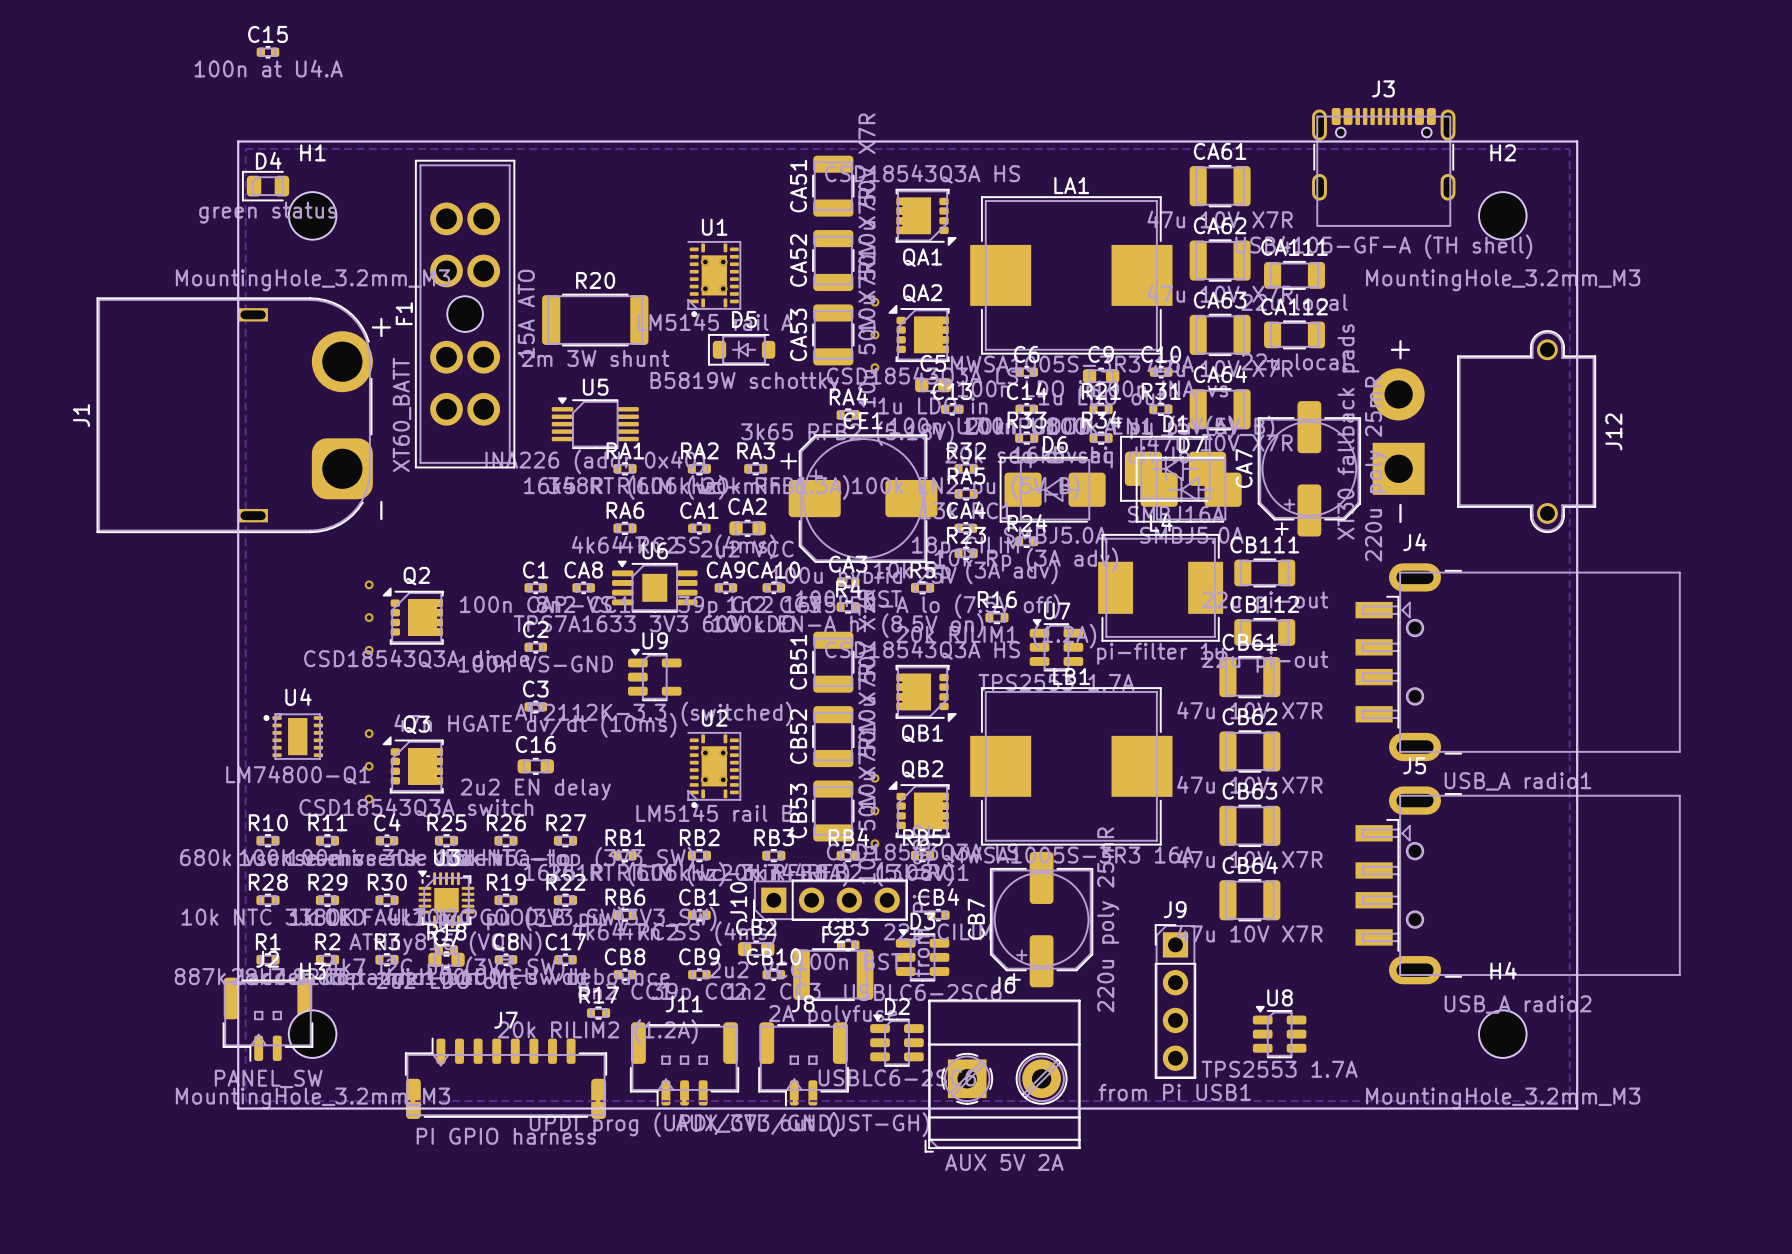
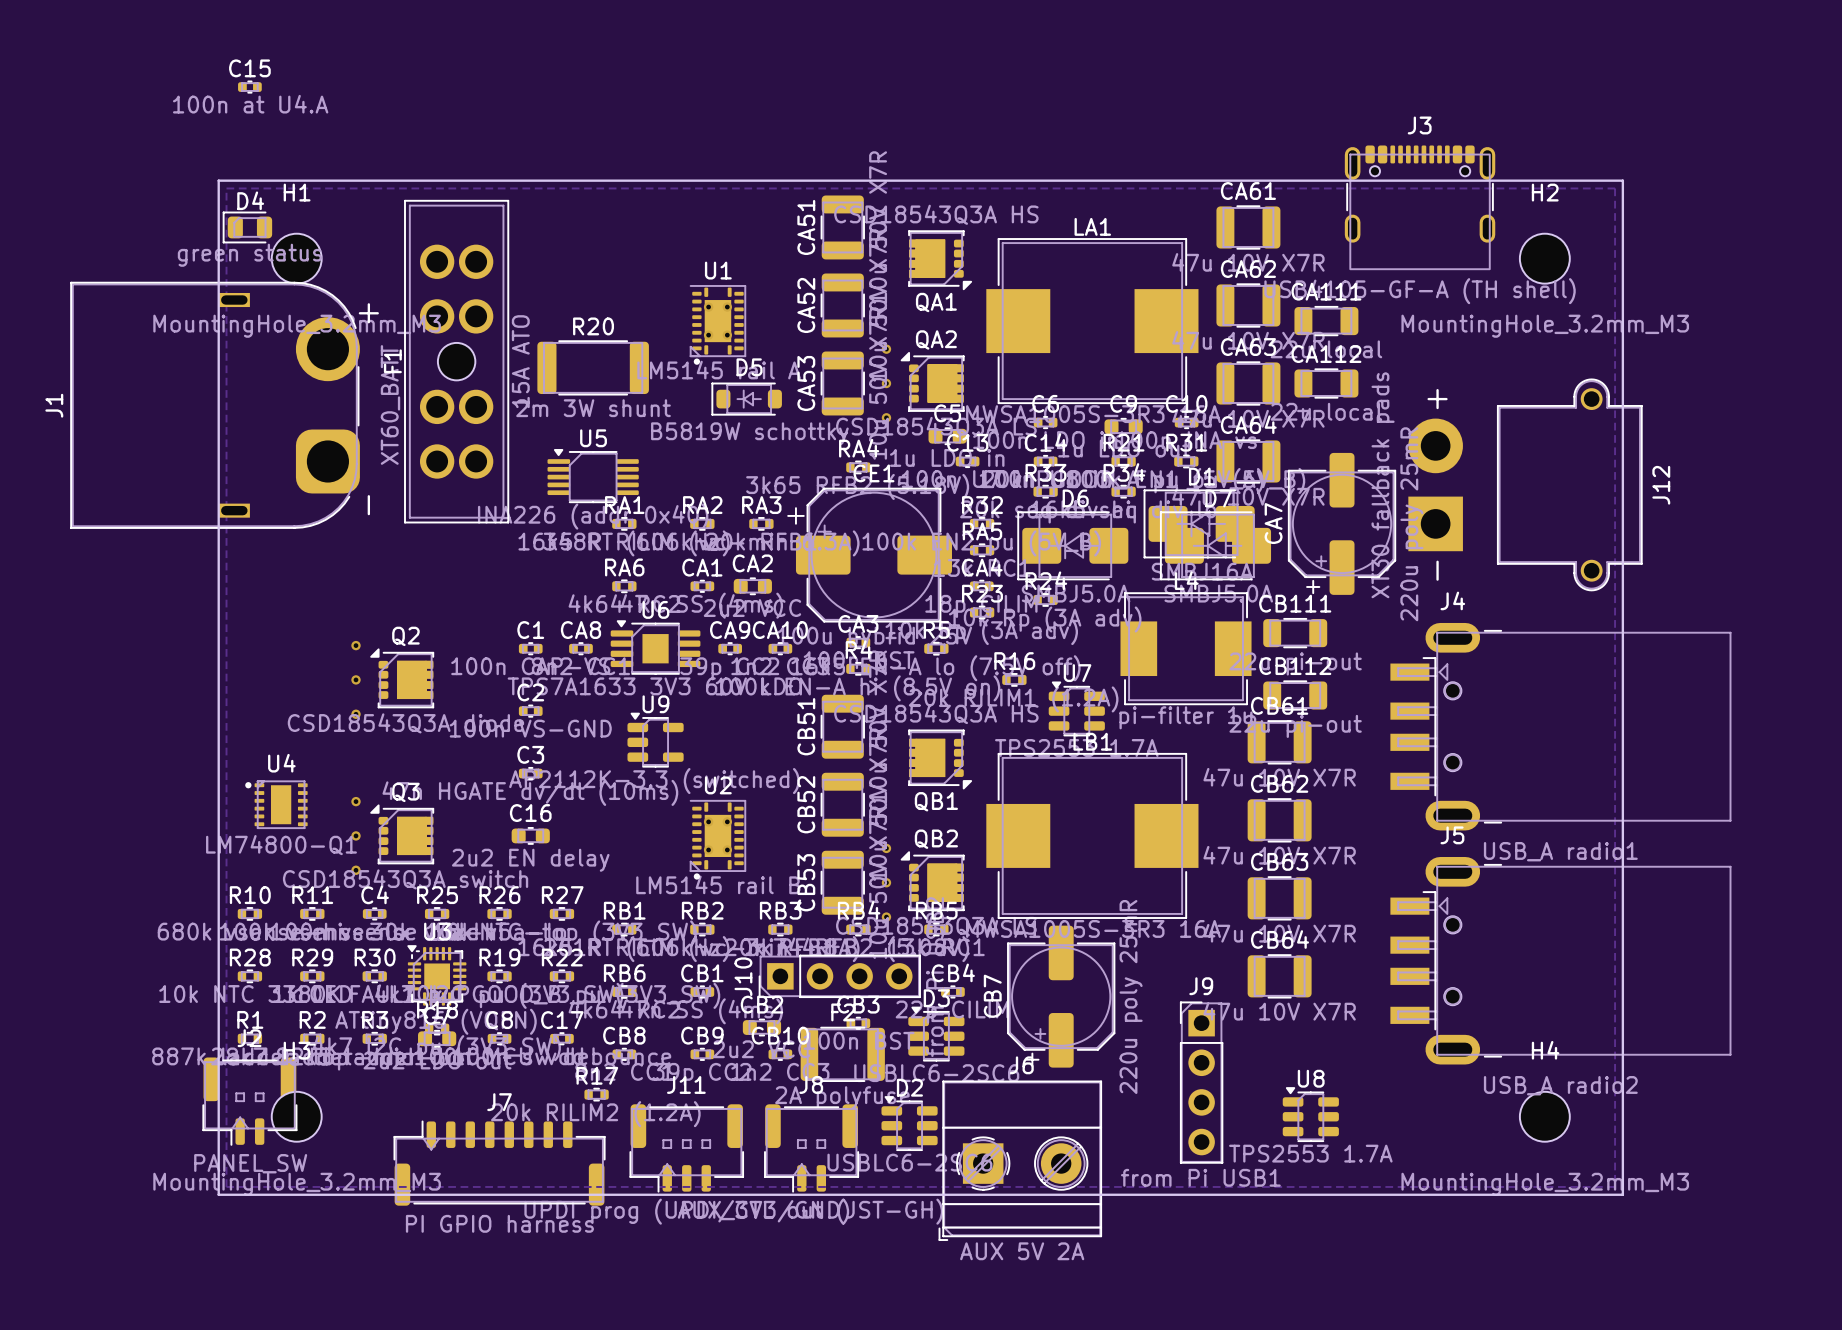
J1 position: (234, 415) -> (215, 405)

